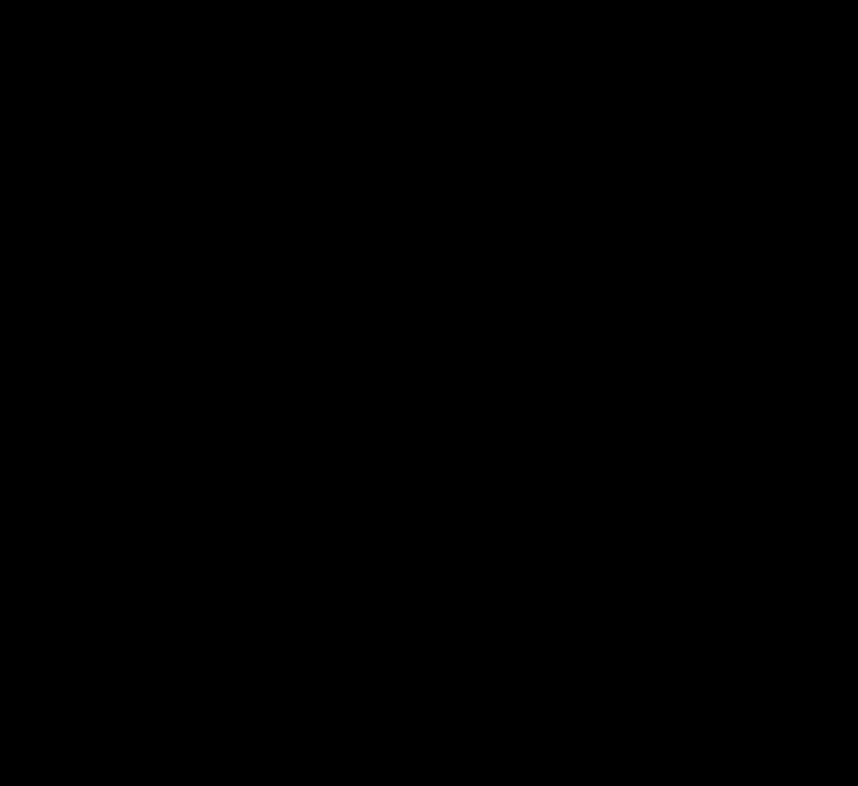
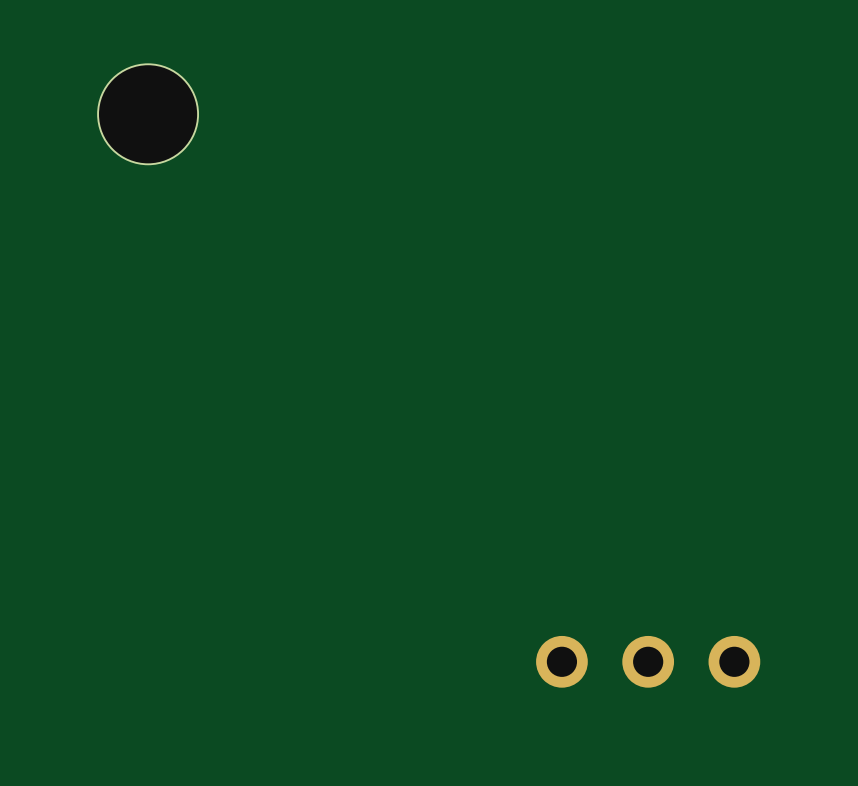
part: none -> (148, 114)
part: none -> (648, 661)

